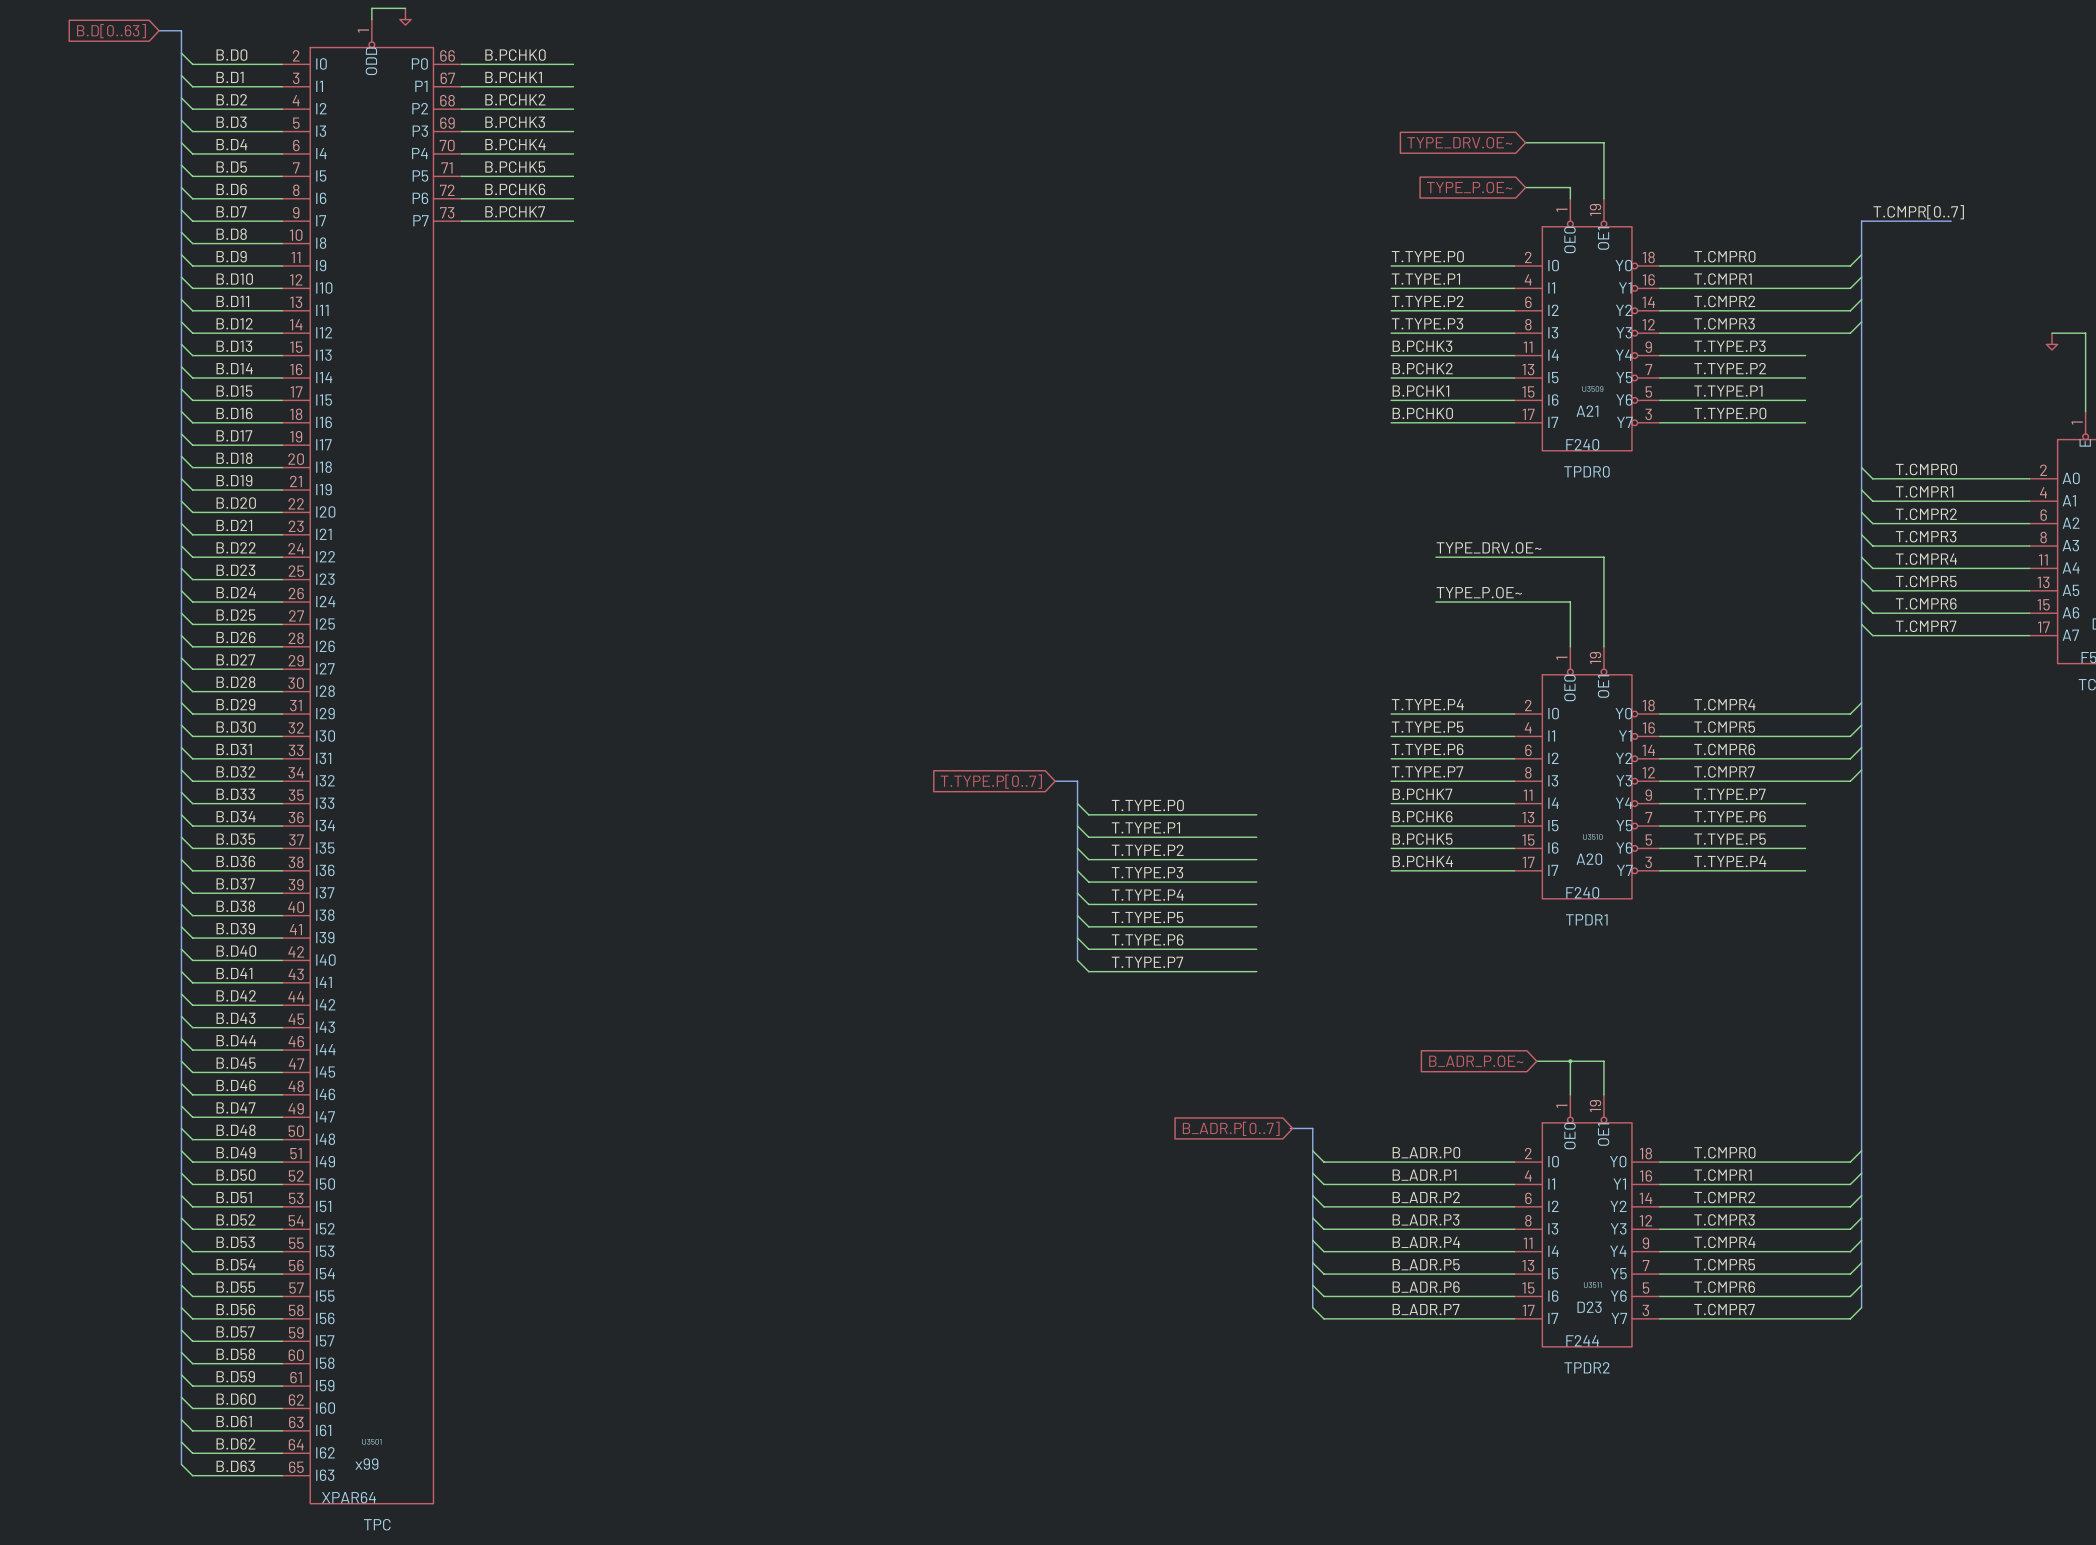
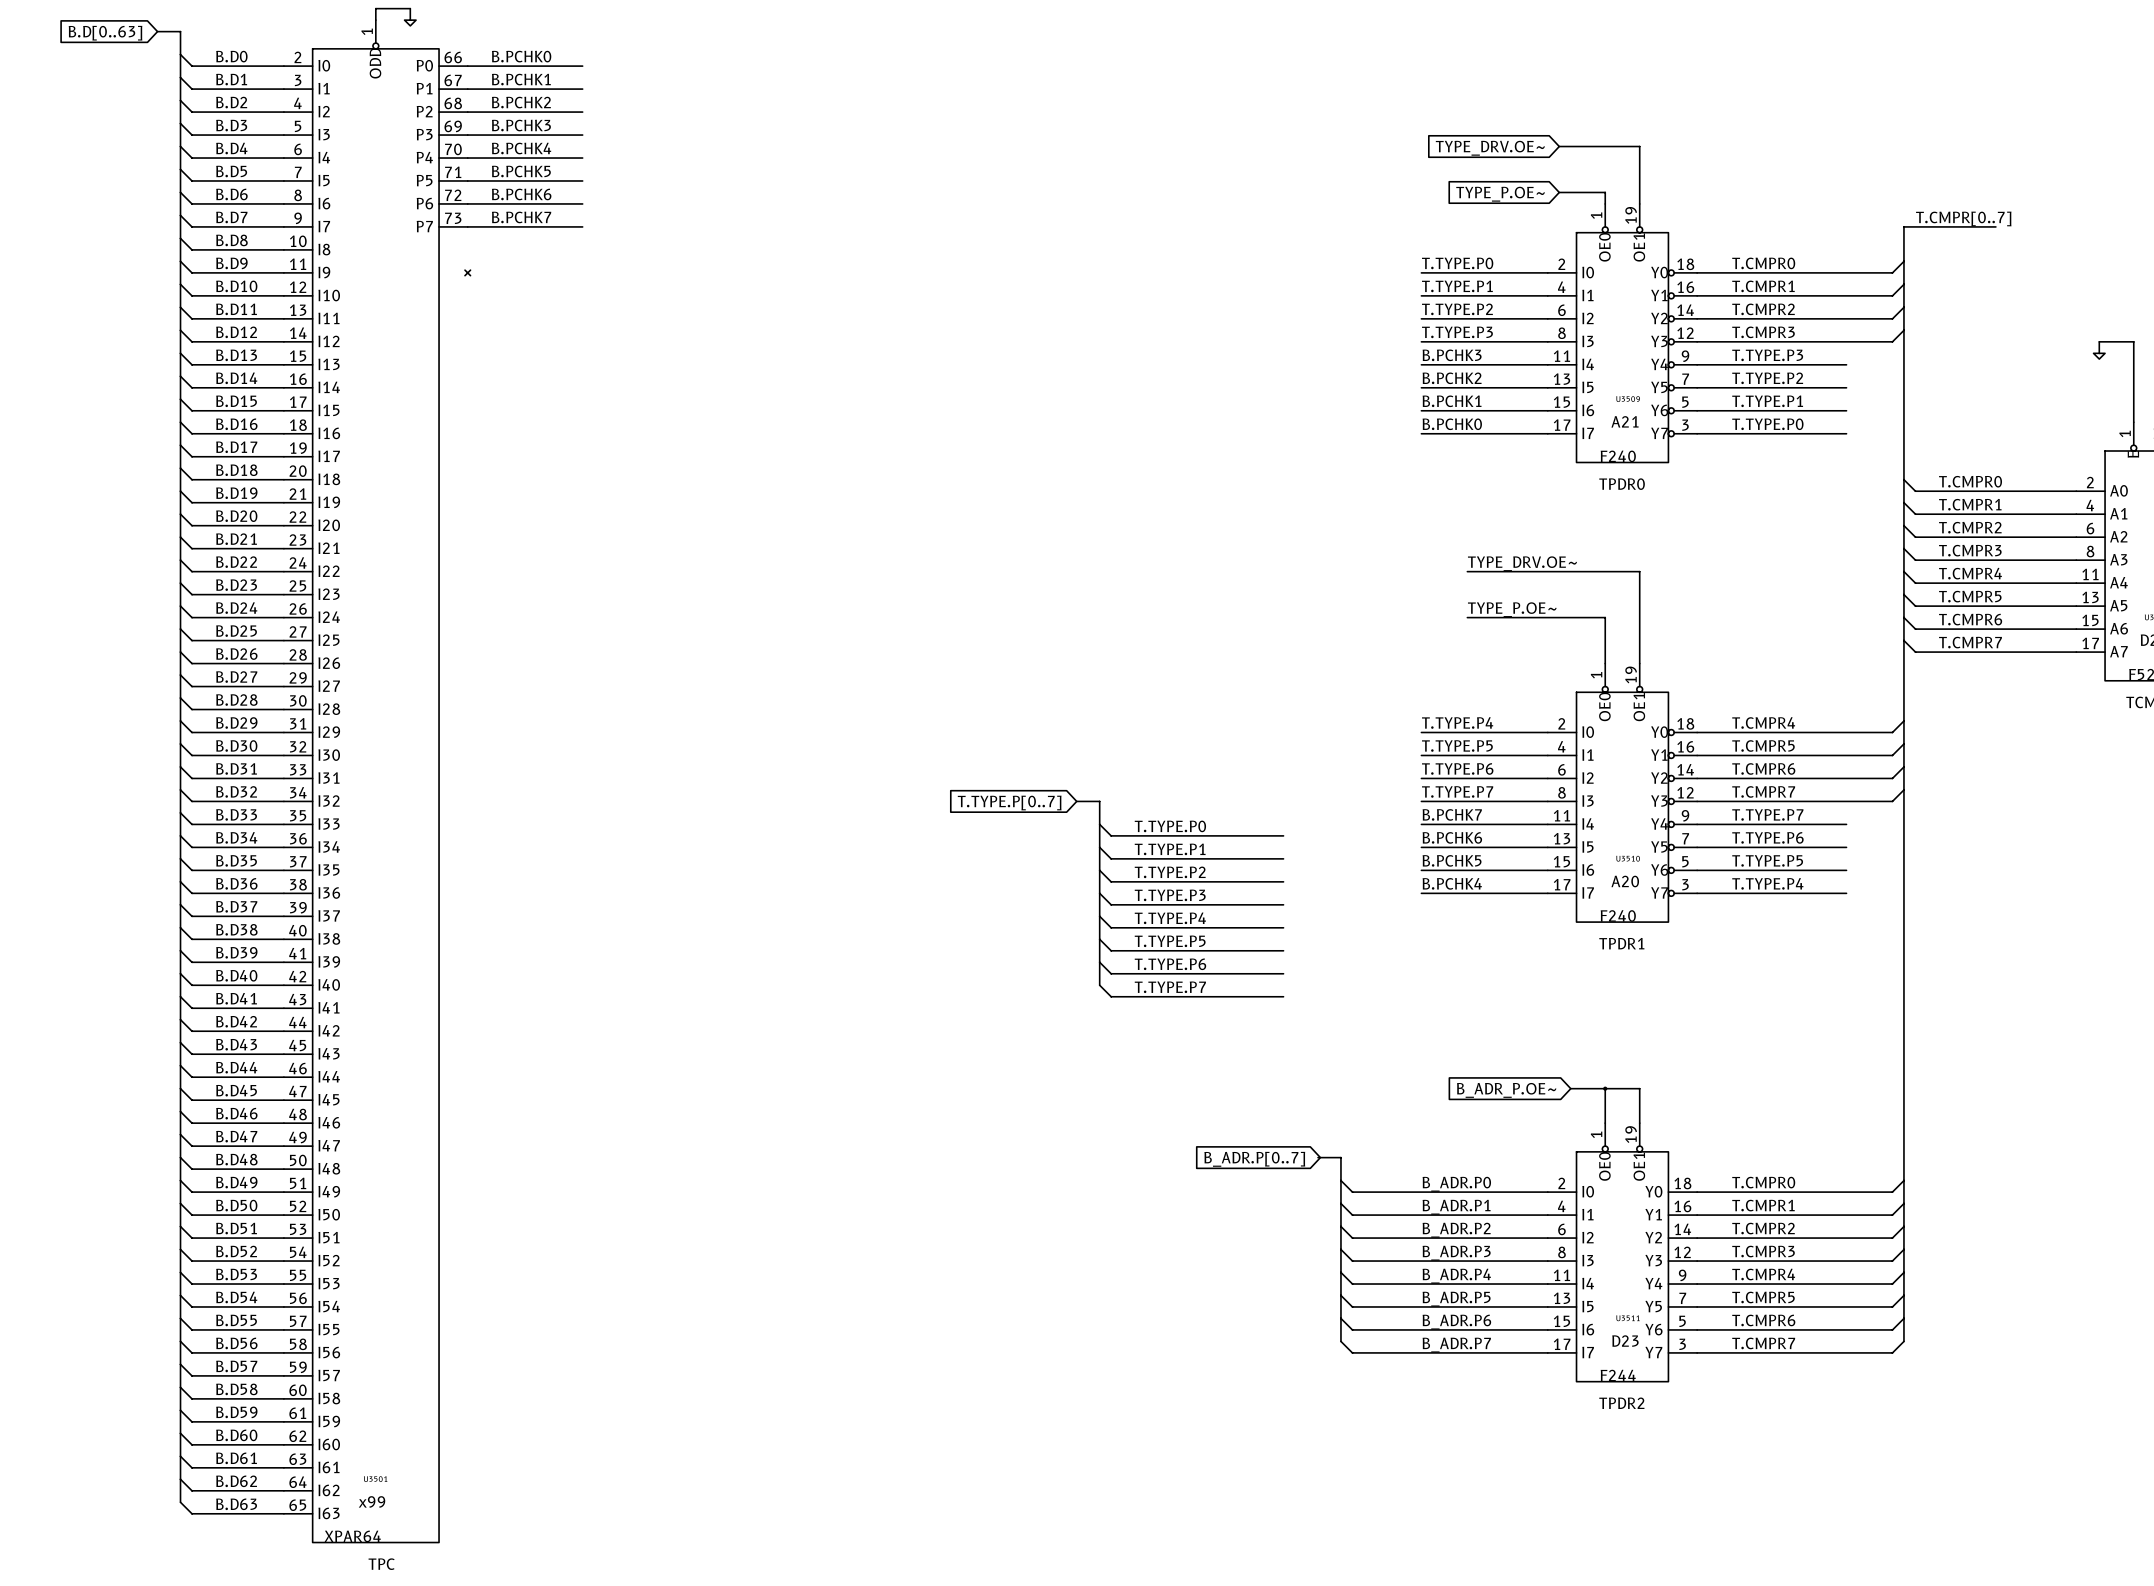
no-connect mark: none -> (467, 272)

